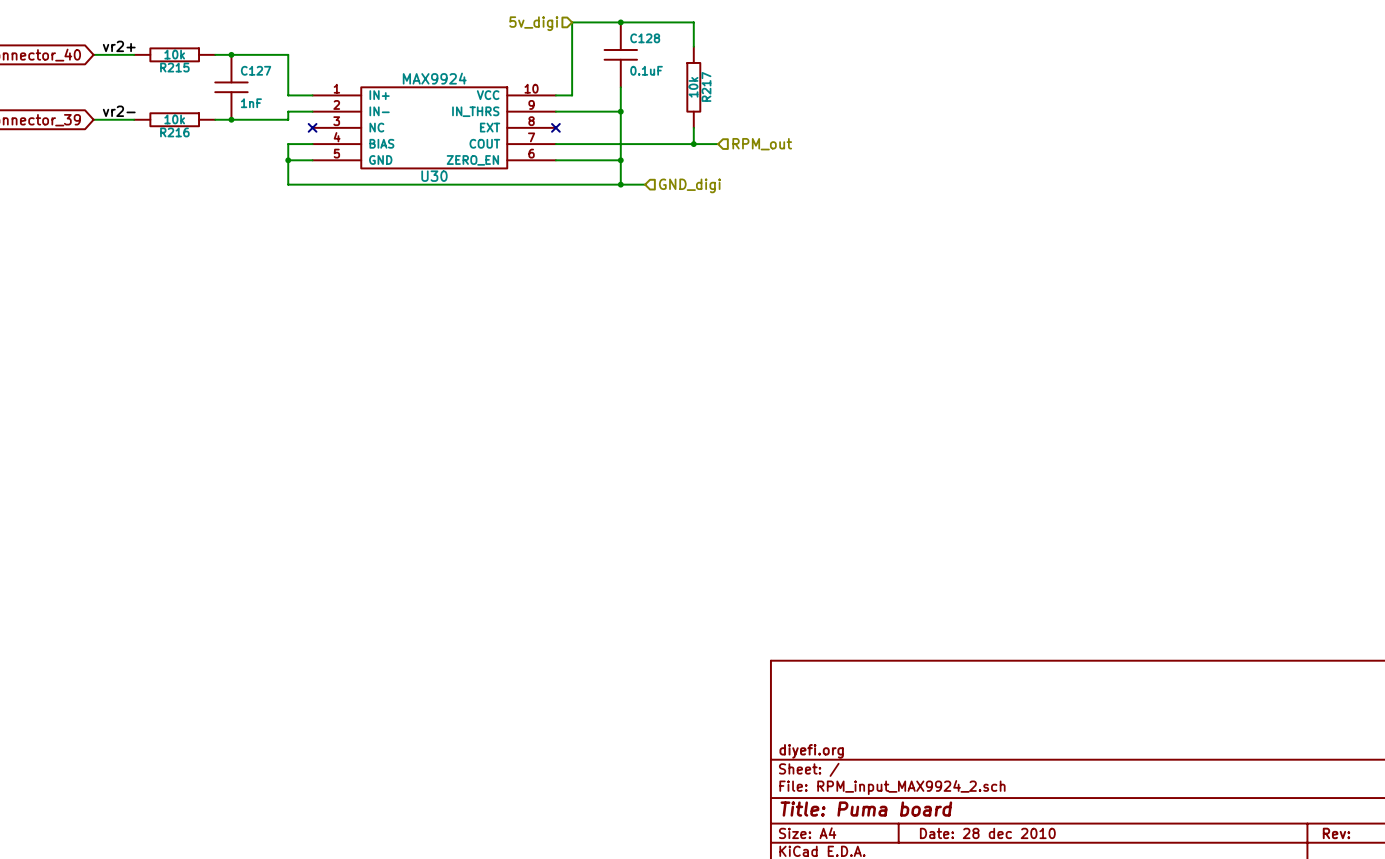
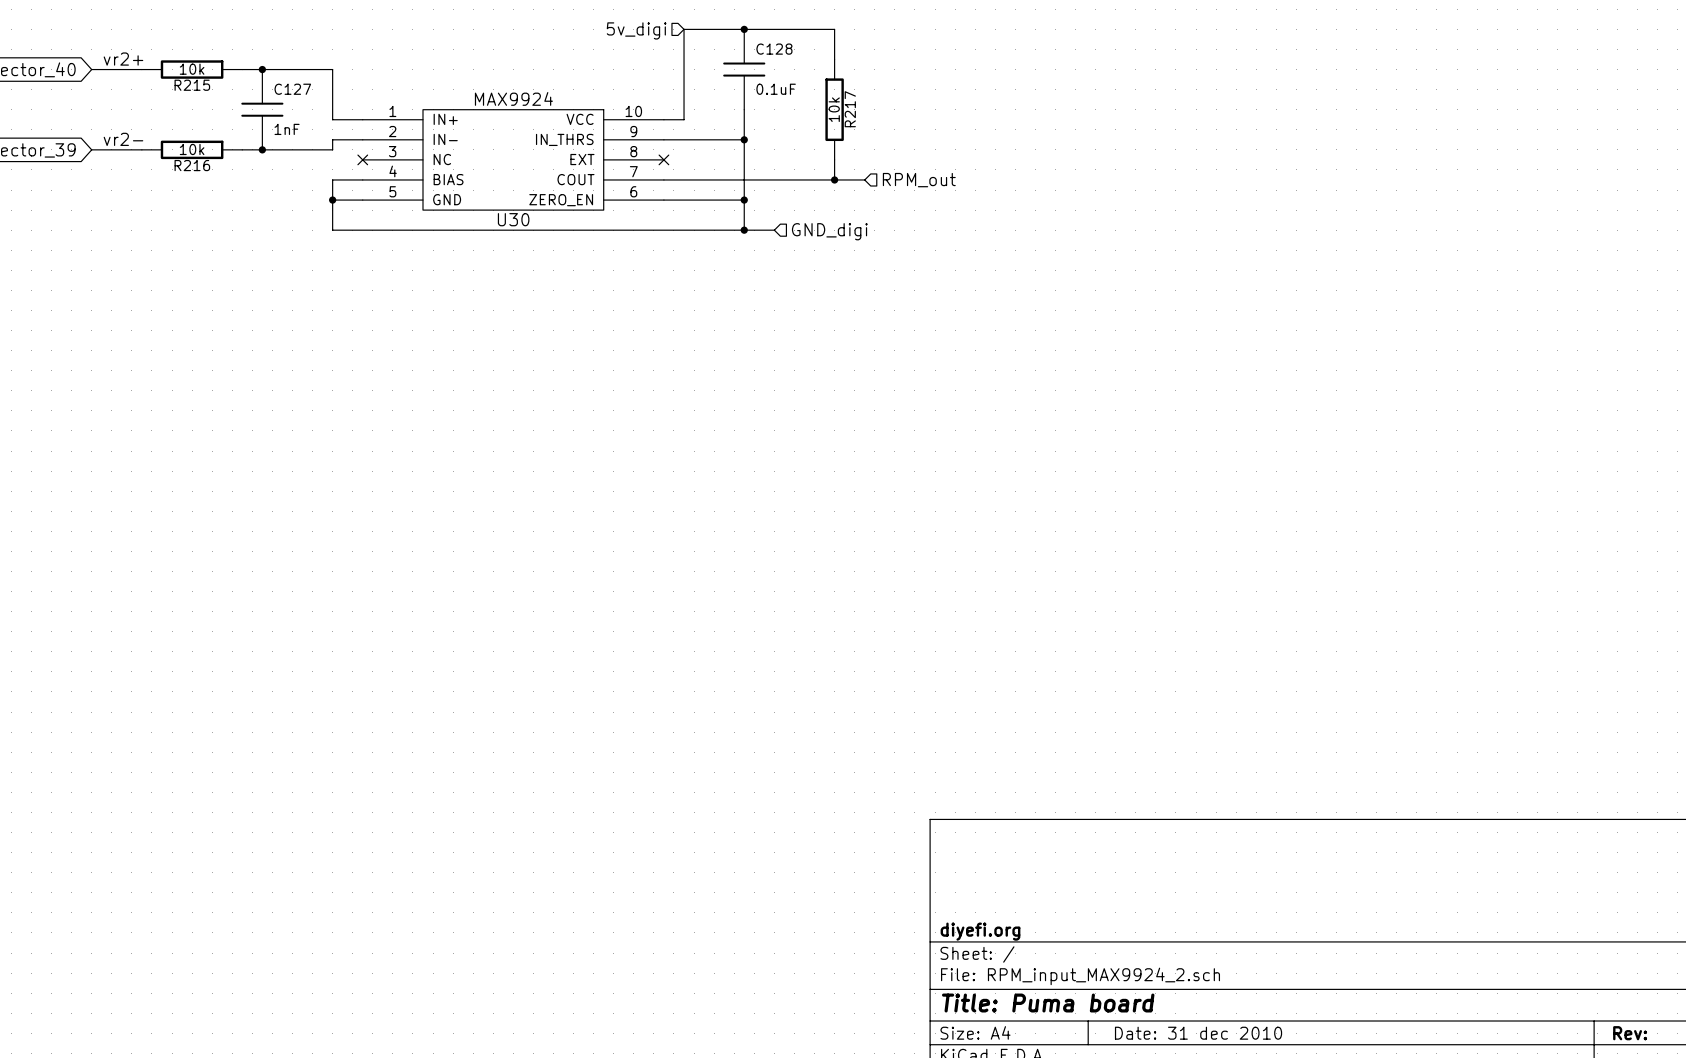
title block: Date: 28 dec 2010 (987, 833) -> Date: 31 dec 2010 (1198, 1033)

